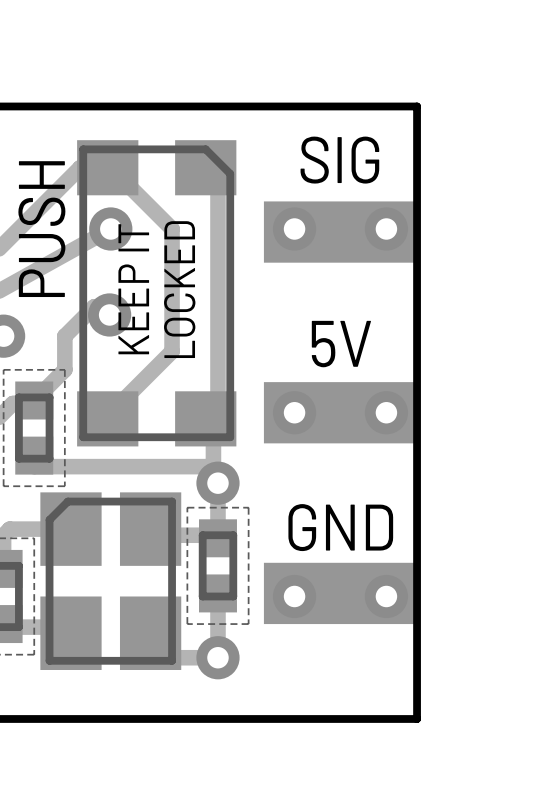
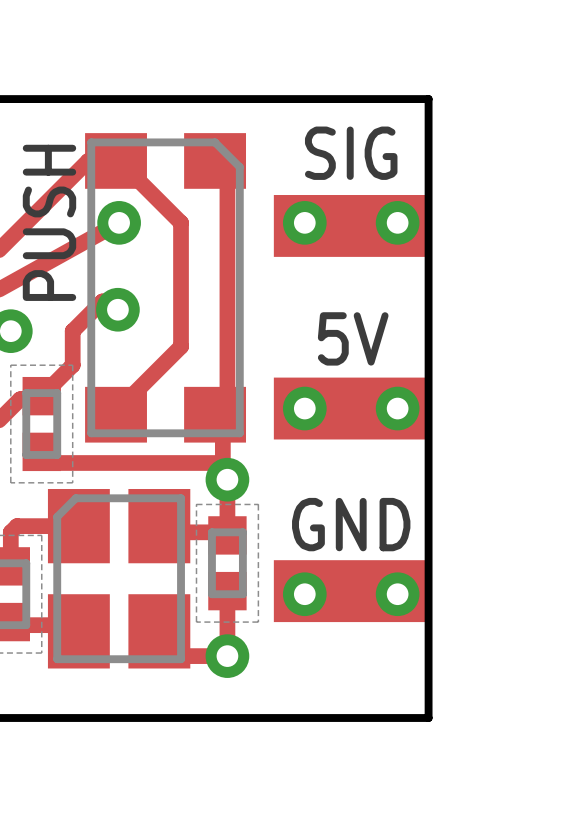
text: KEEP IT (133, 289) -> none
text: LOCKED (179, 289) -> none

